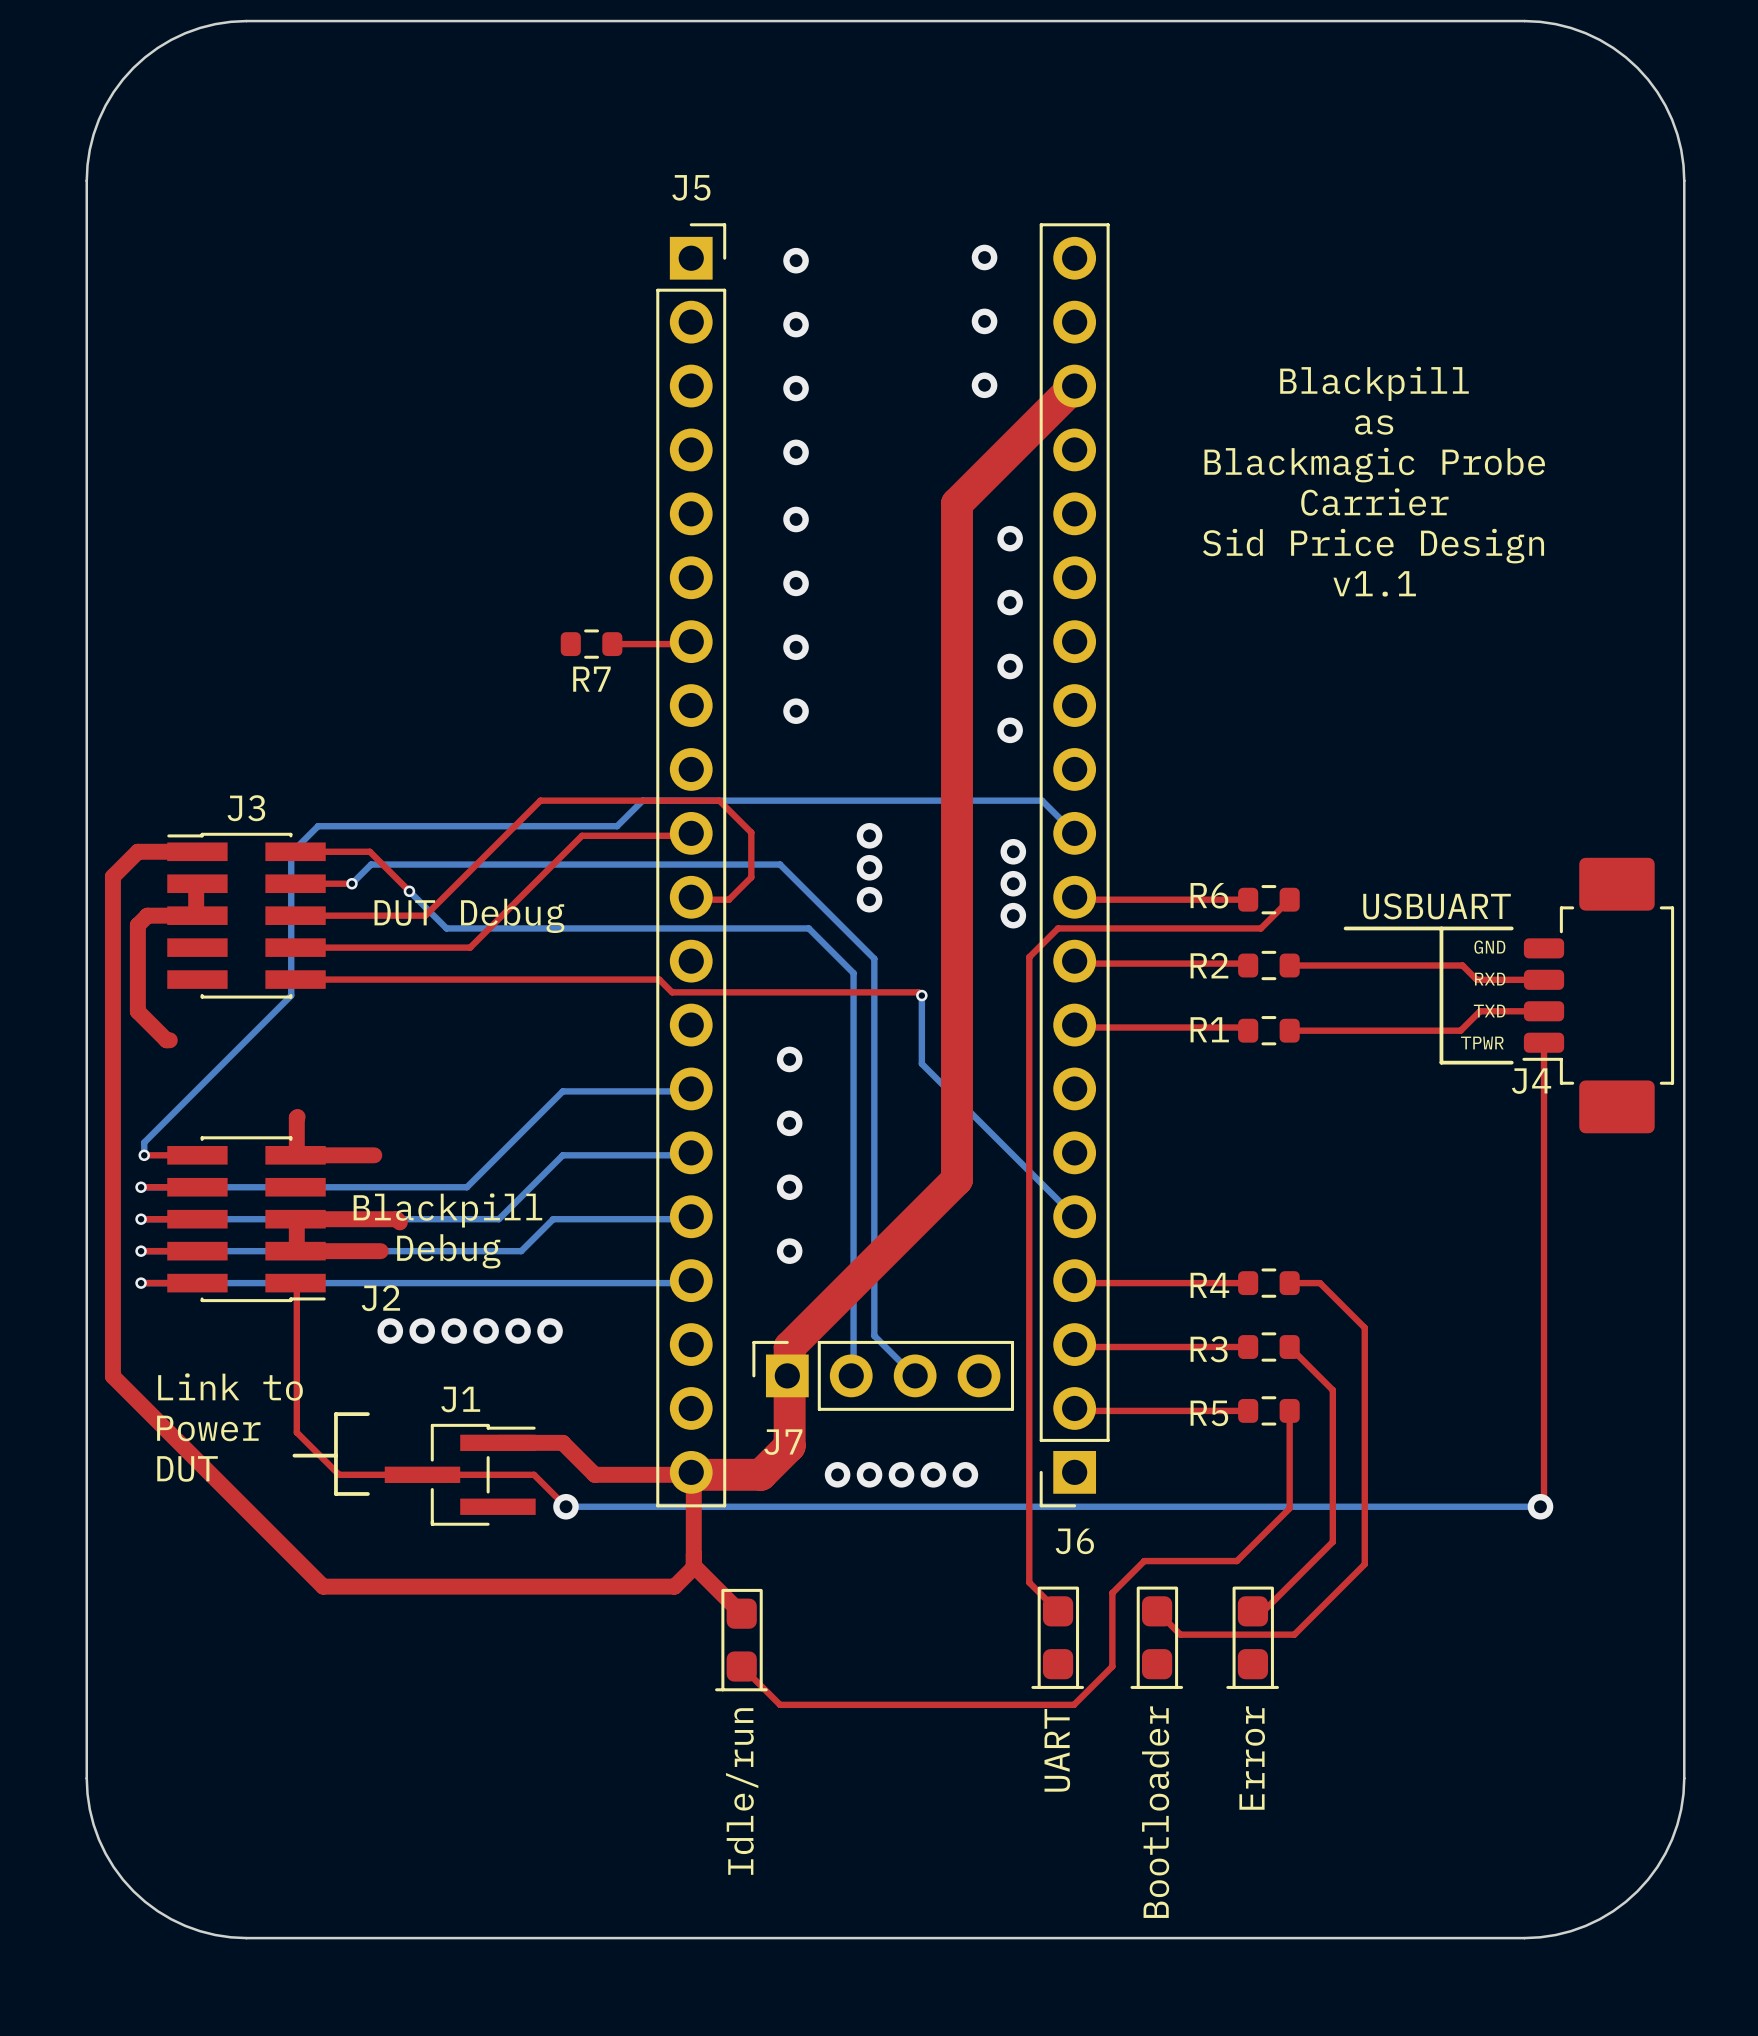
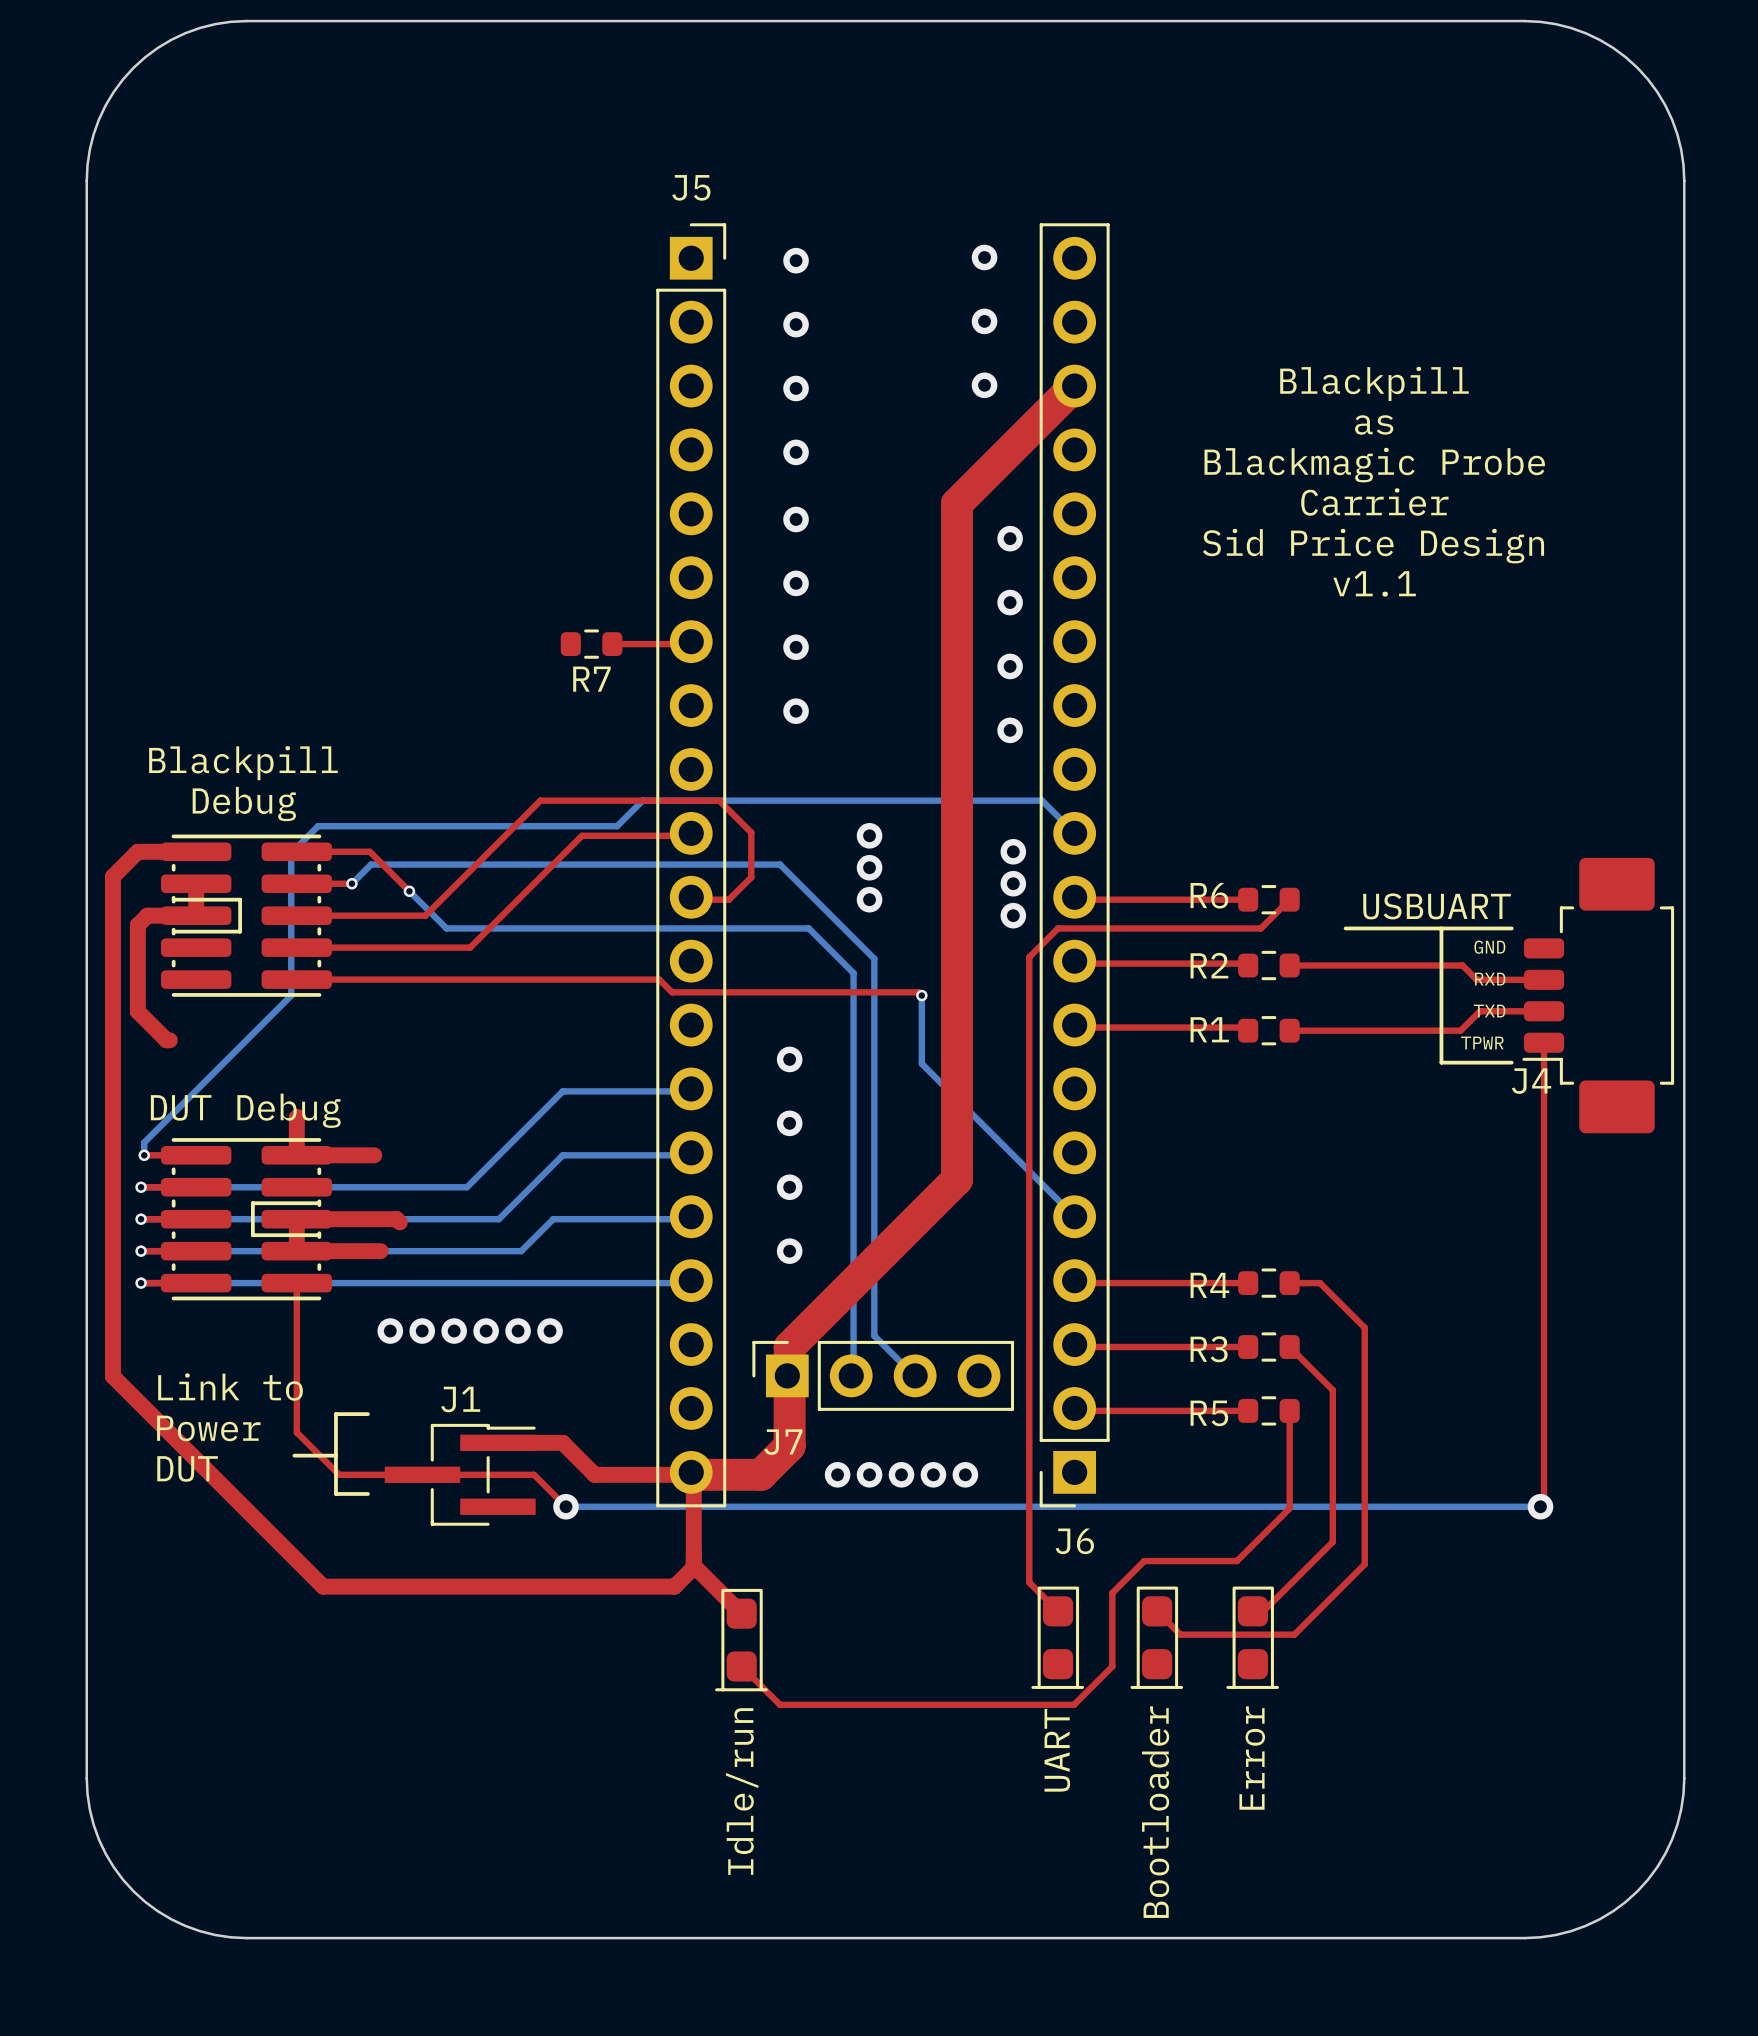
J3: (246, 915) -> none
part: none -> (246, 915)
text position: DUT Debug (469, 915) -> DUT Debug (245, 1110)
text position: Blackpill (447, 1210) -> Blackpill (243, 763)
J2: (246, 1219) -> none
part: none -> (246, 1219)
text position: Debug (448, 1251) -> Debug (244, 804)

